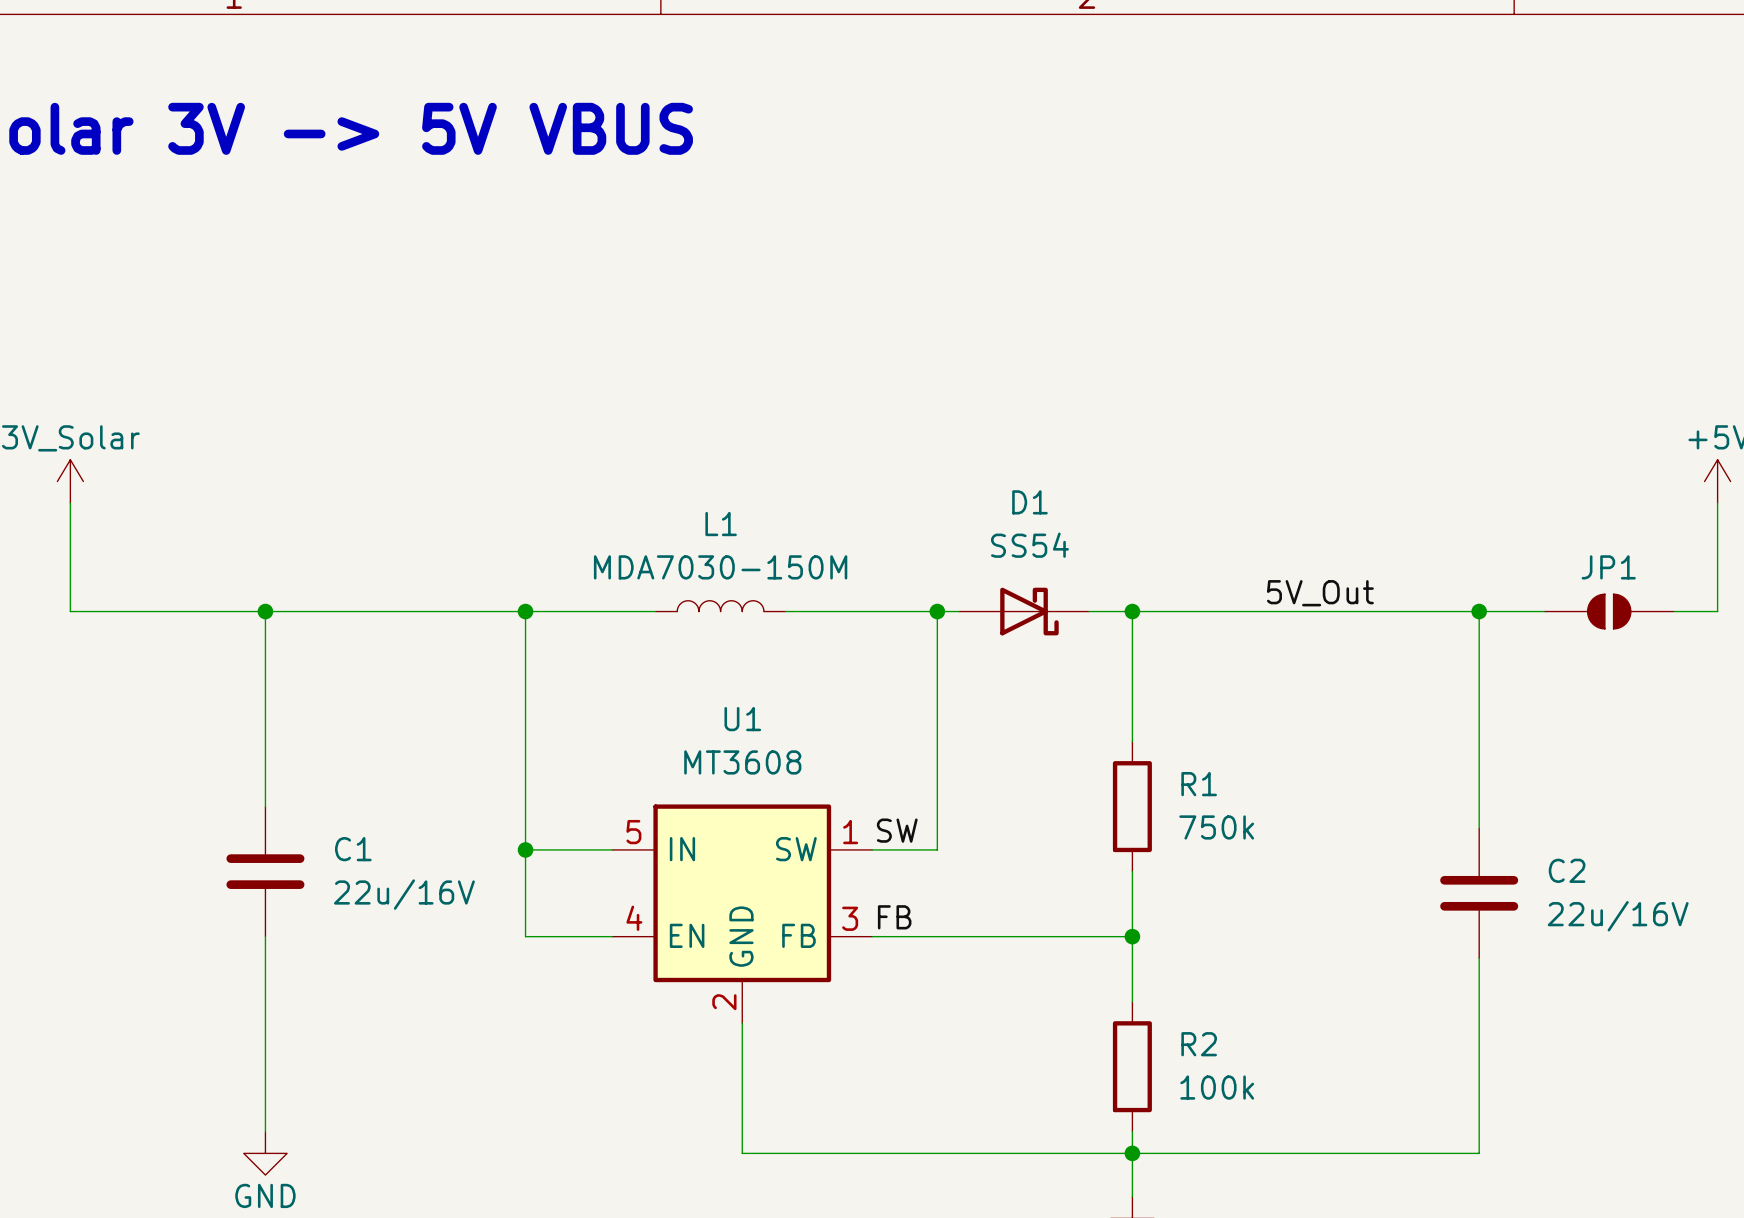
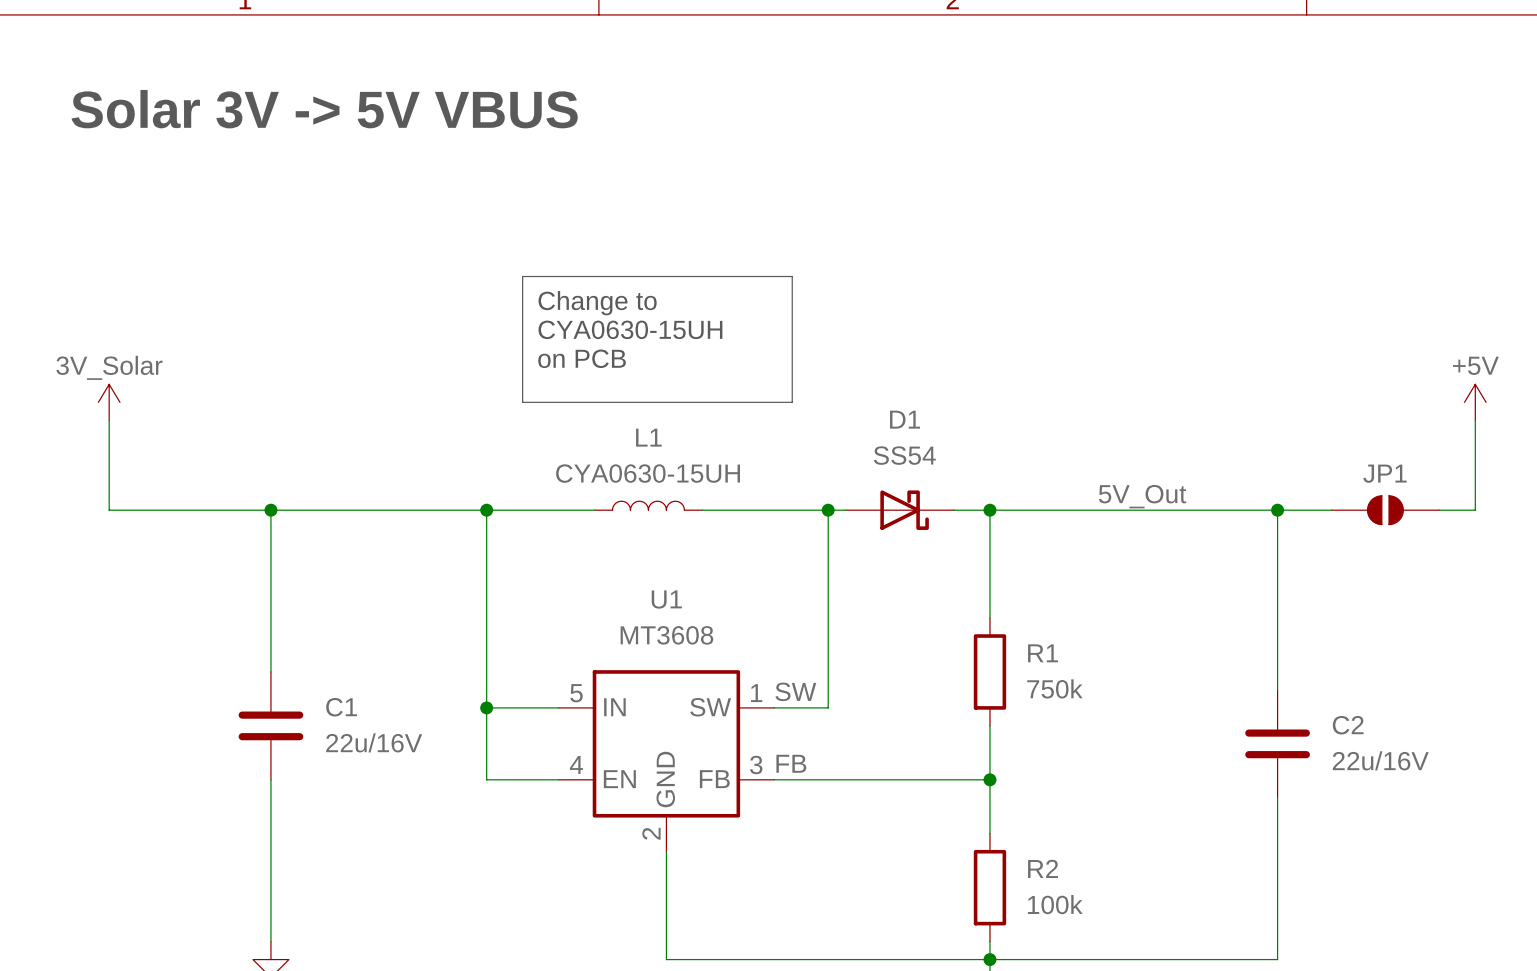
line: none -> (522, 276) (792, 276) (792, 402) (522, 402) (522, 276)
text: none -> Change to (597, 303)
text: none -> CYA0630-15UH (630, 329)
text: none -> on PCB (582, 358)
L1 value: MDA7030-150M (720, 567) -> CYA0630-15UH (648, 473)

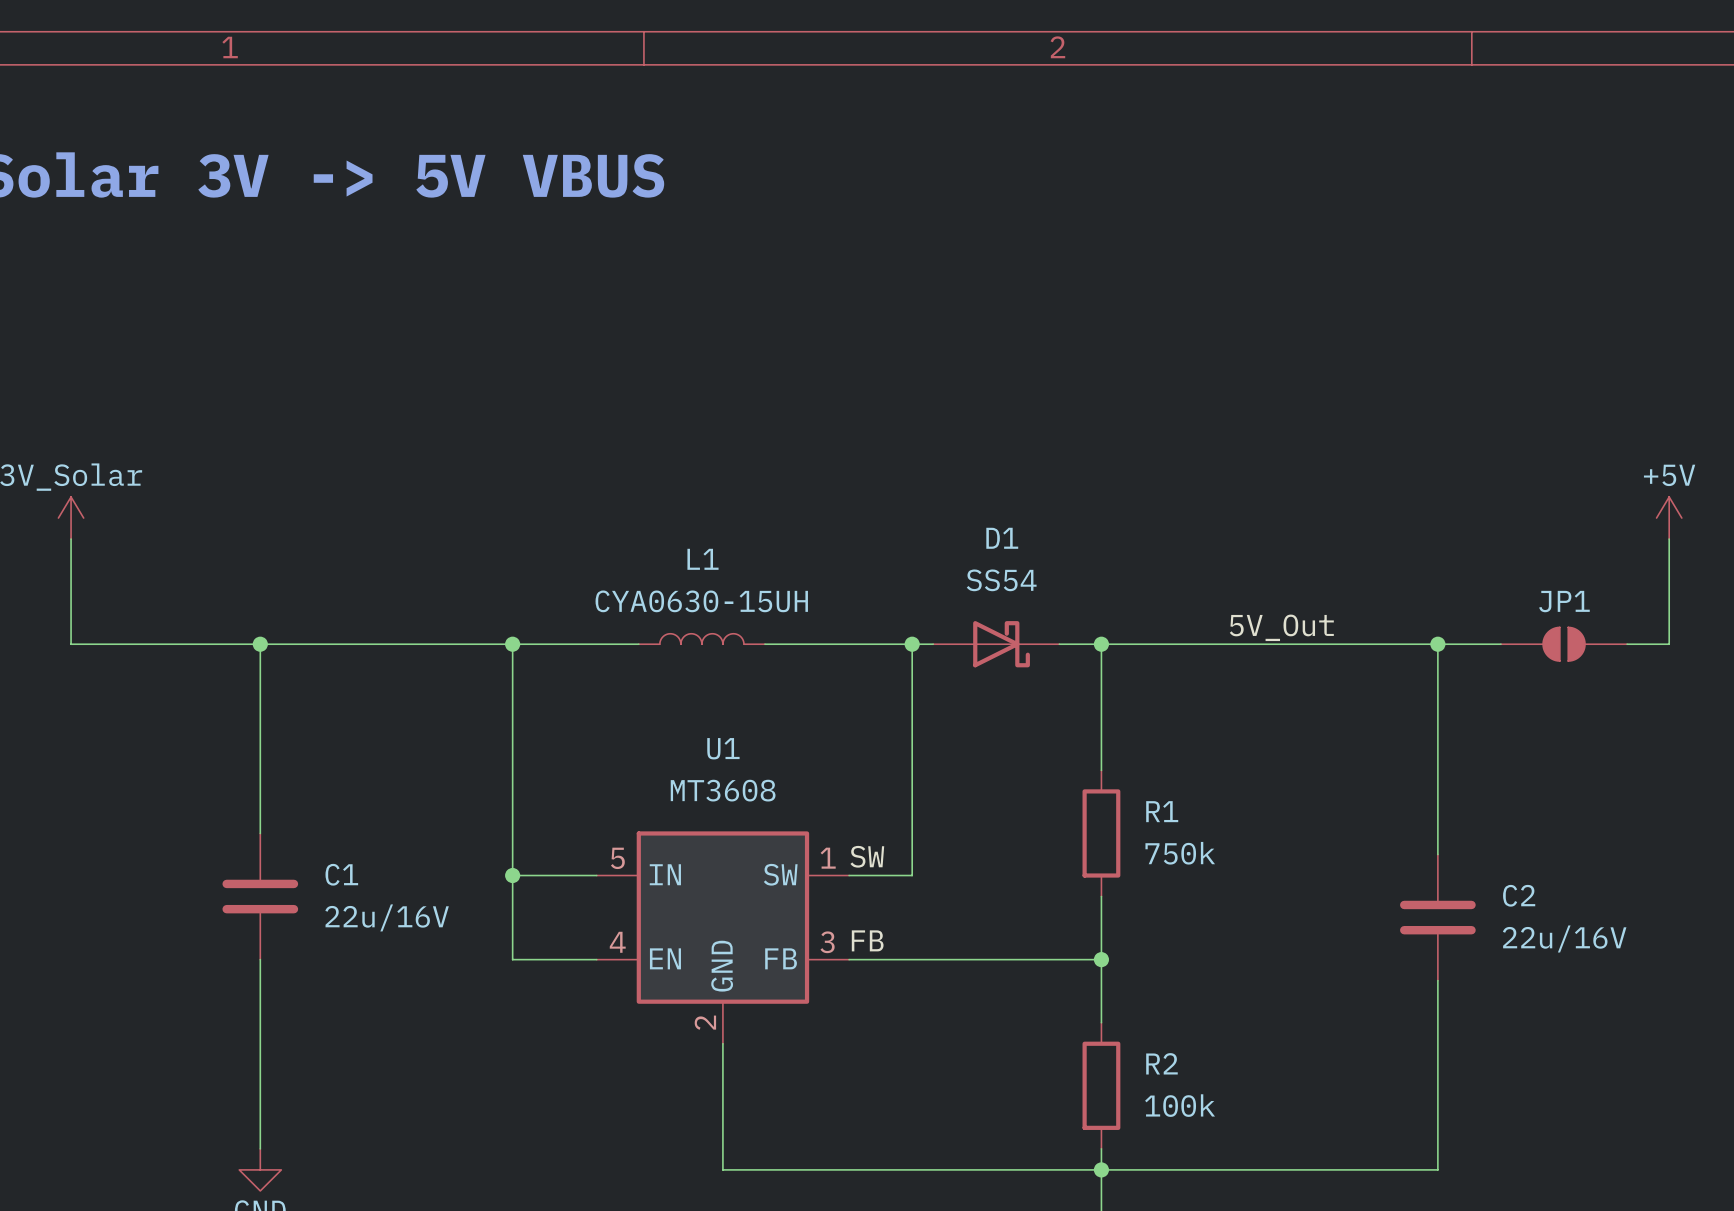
line: (522, 276) (792, 276) (792, 402) (522, 402) (522, 276) -> none
text: Change to (597, 303) -> none
text: CYA0630-15UH (630, 329) -> none
text: on PCB (582, 358) -> none

